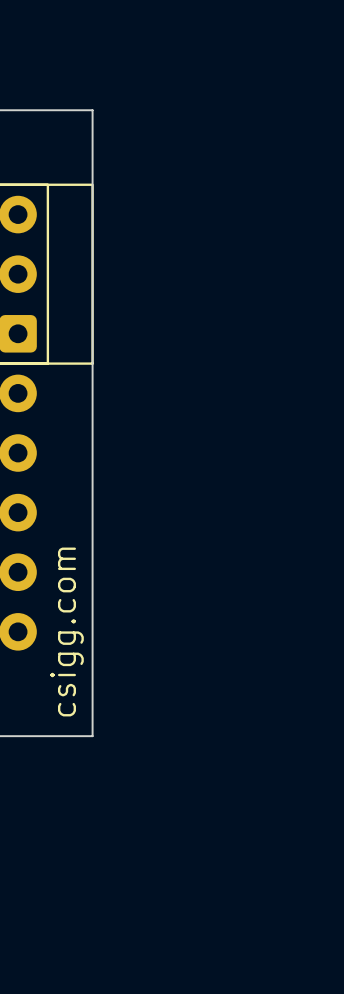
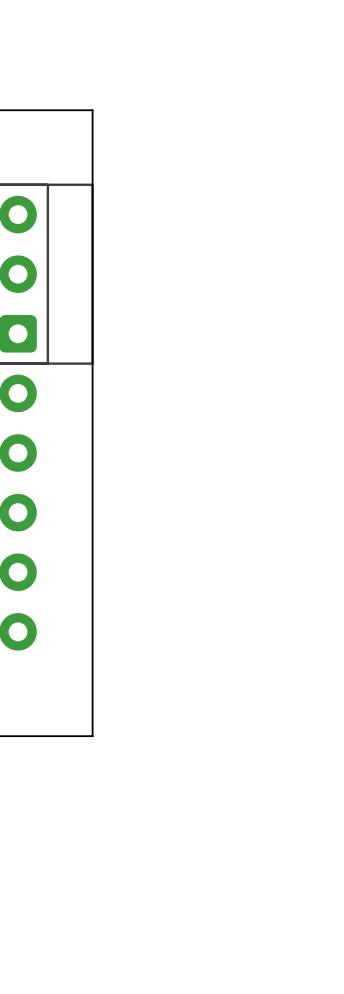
text: csigg.com (66, 631) -> none

